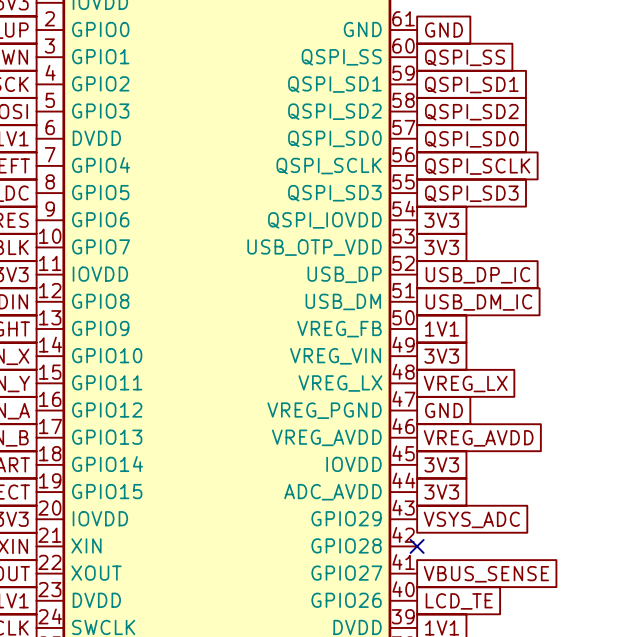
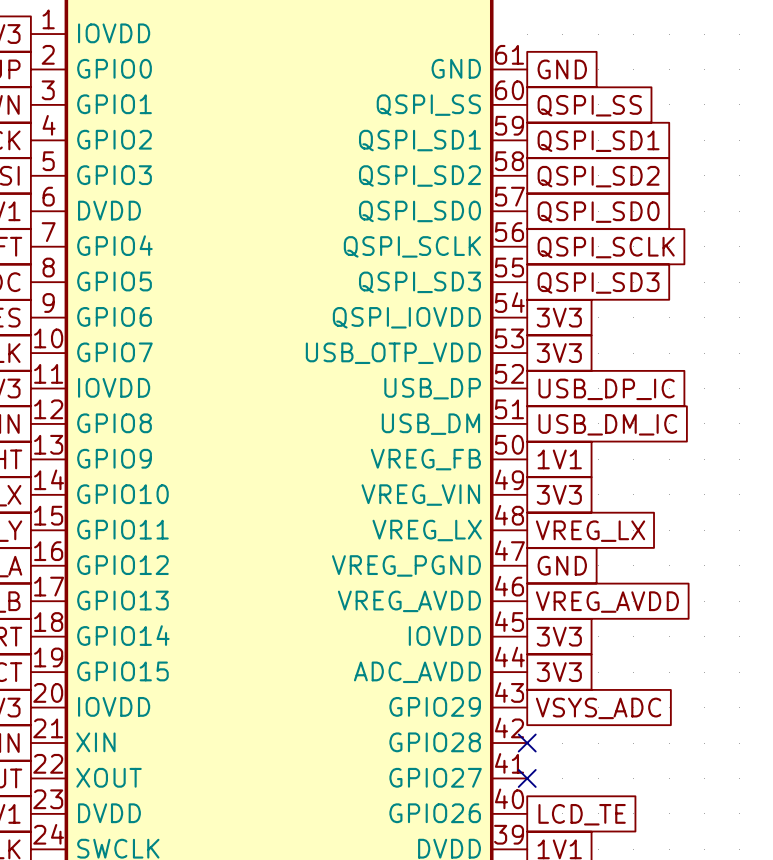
no-connect mark: none -> (527, 778)
global label: VBUS_SENSE (486, 574) -> none

